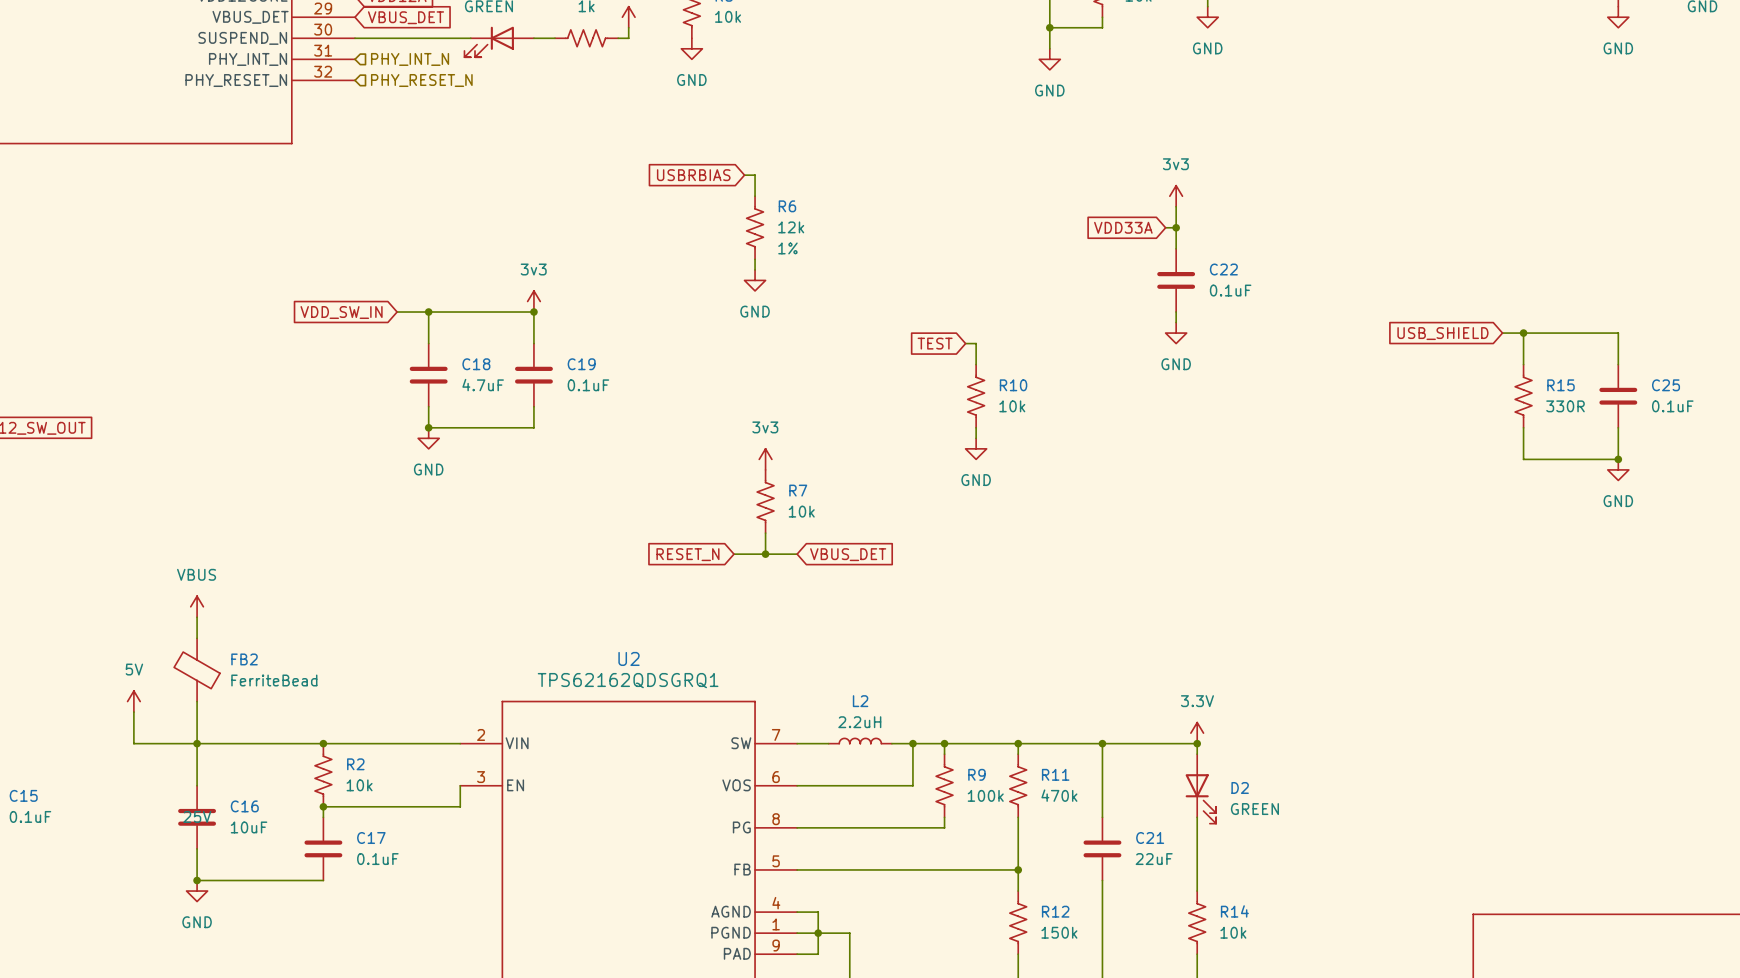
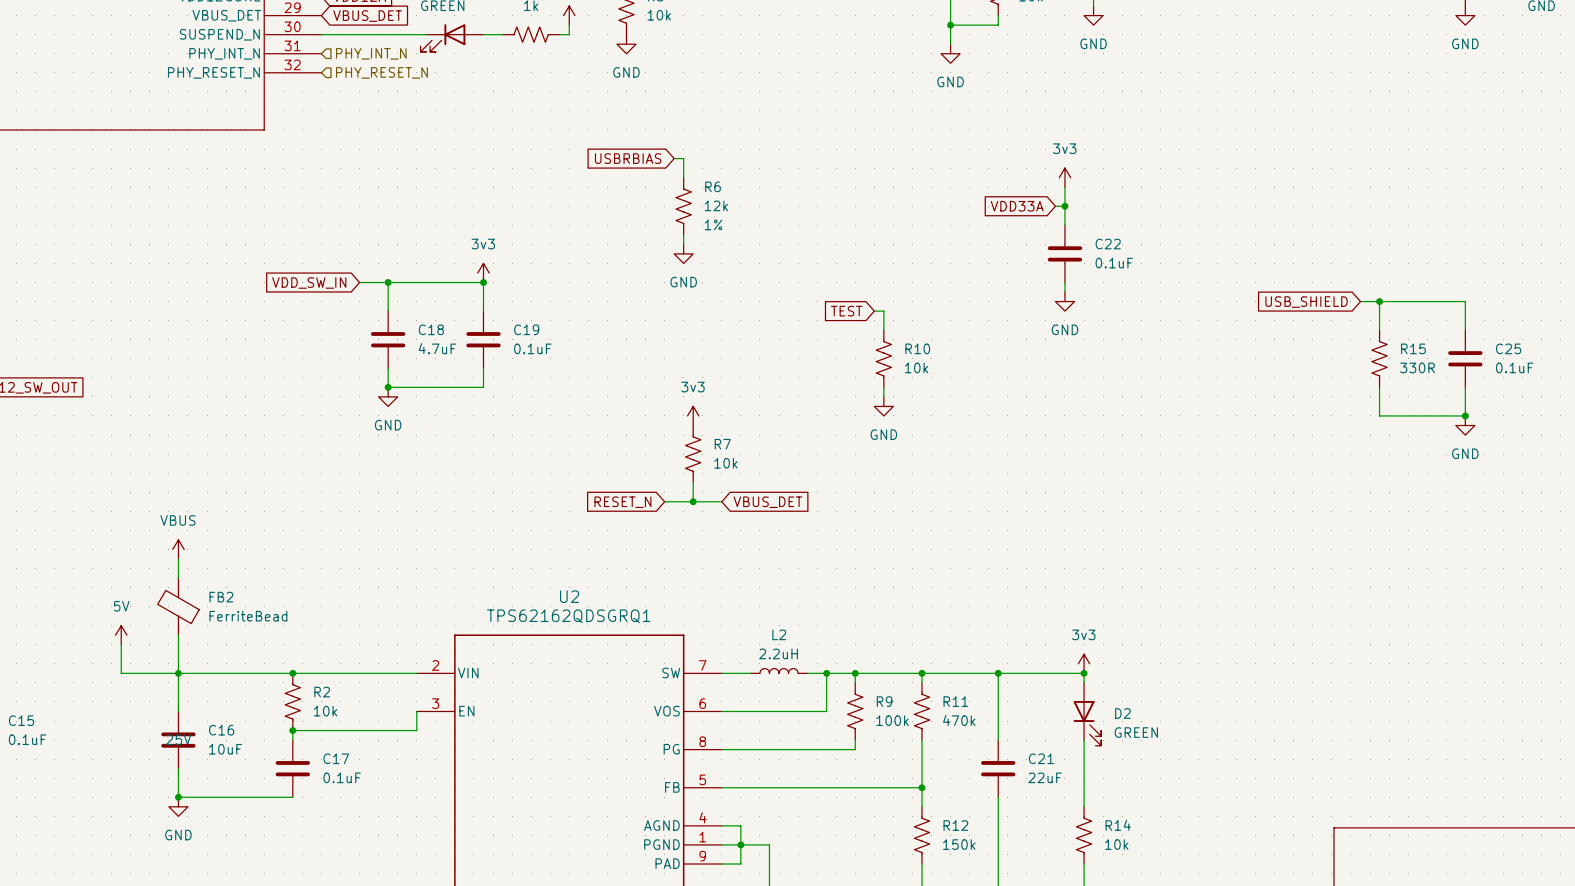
power symbol: 3.3V (1197, 733) -> 3v3 (1084, 663)

